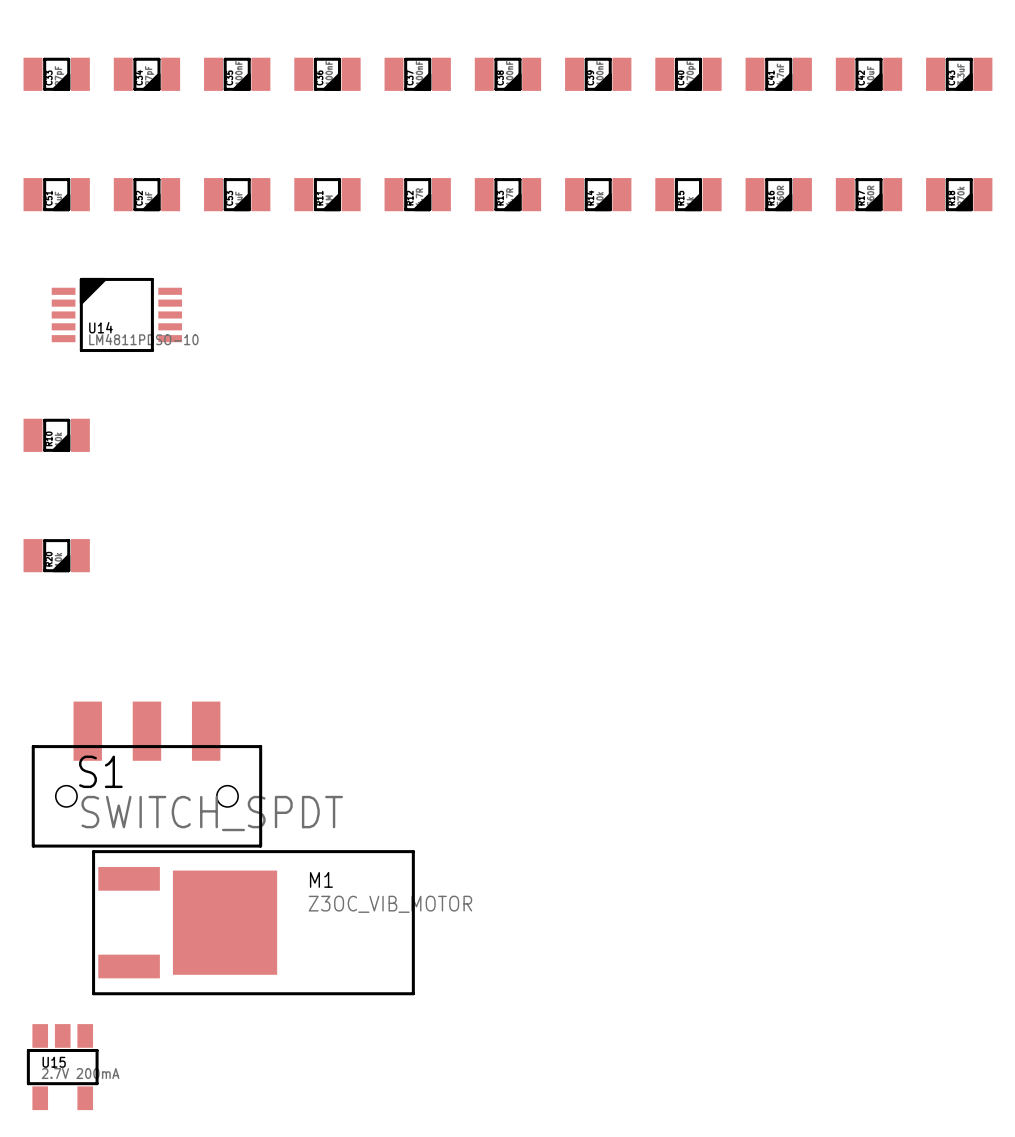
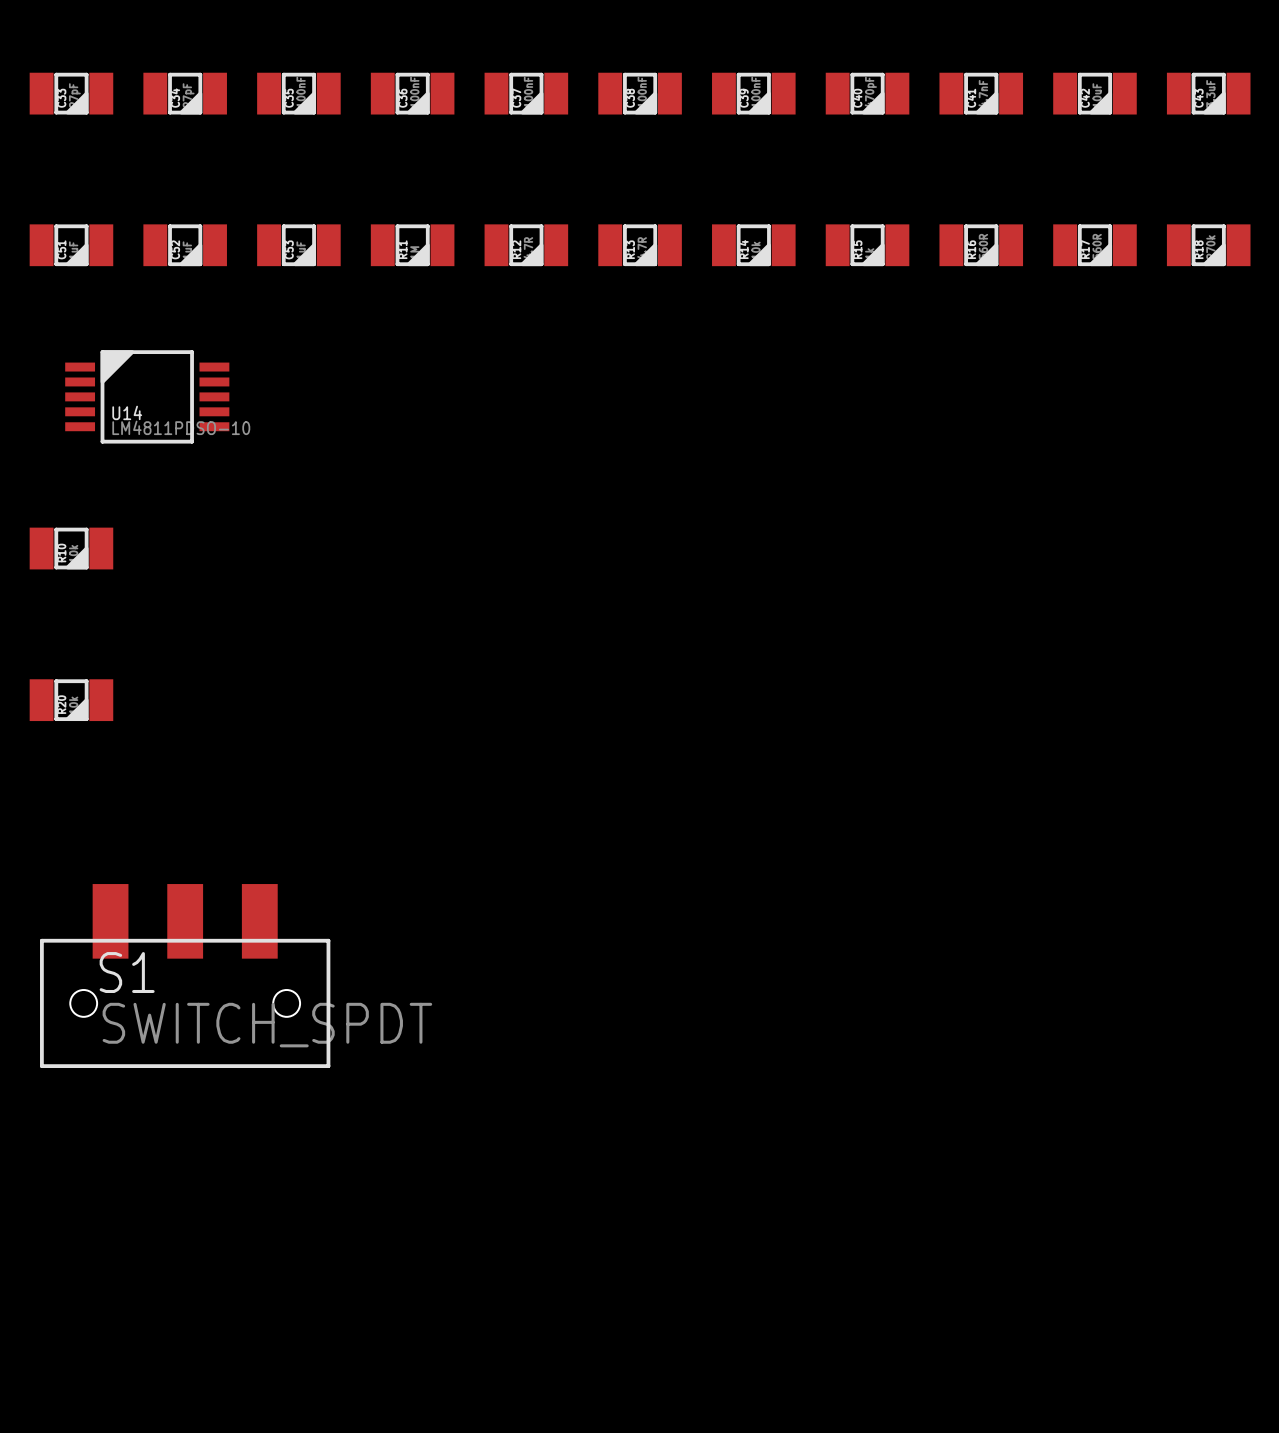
M1: Z3OC_VIB_MOTOR (253, 922) -> none
U15: 2.7V 200mA (62, 1067) -> none

